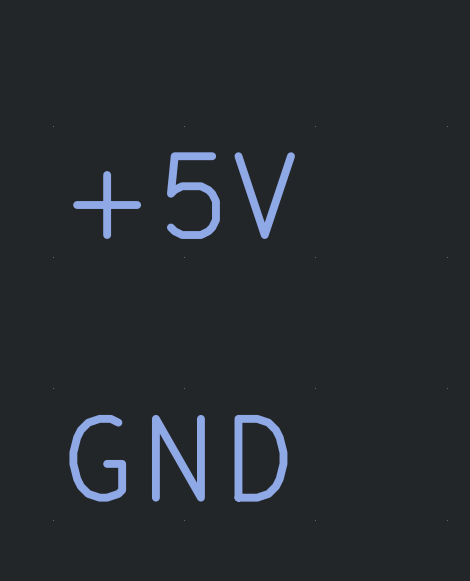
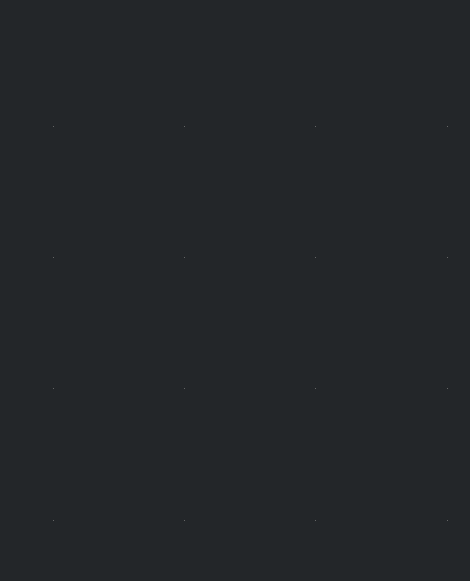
text: +5V (184, 195) -> none
text: GND (178, 458) -> none

